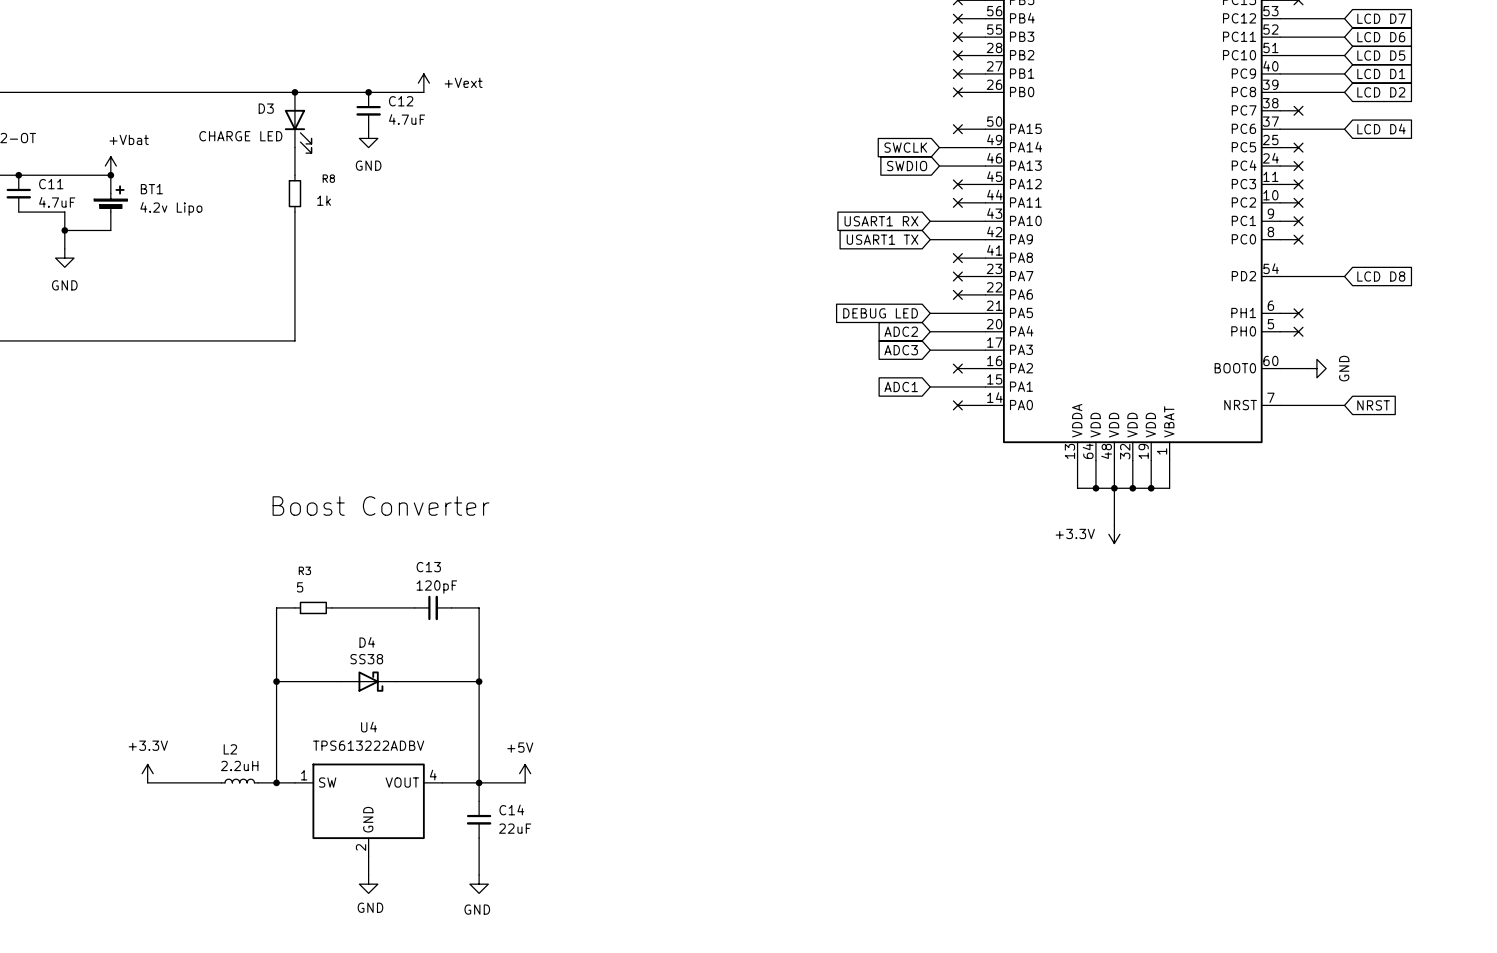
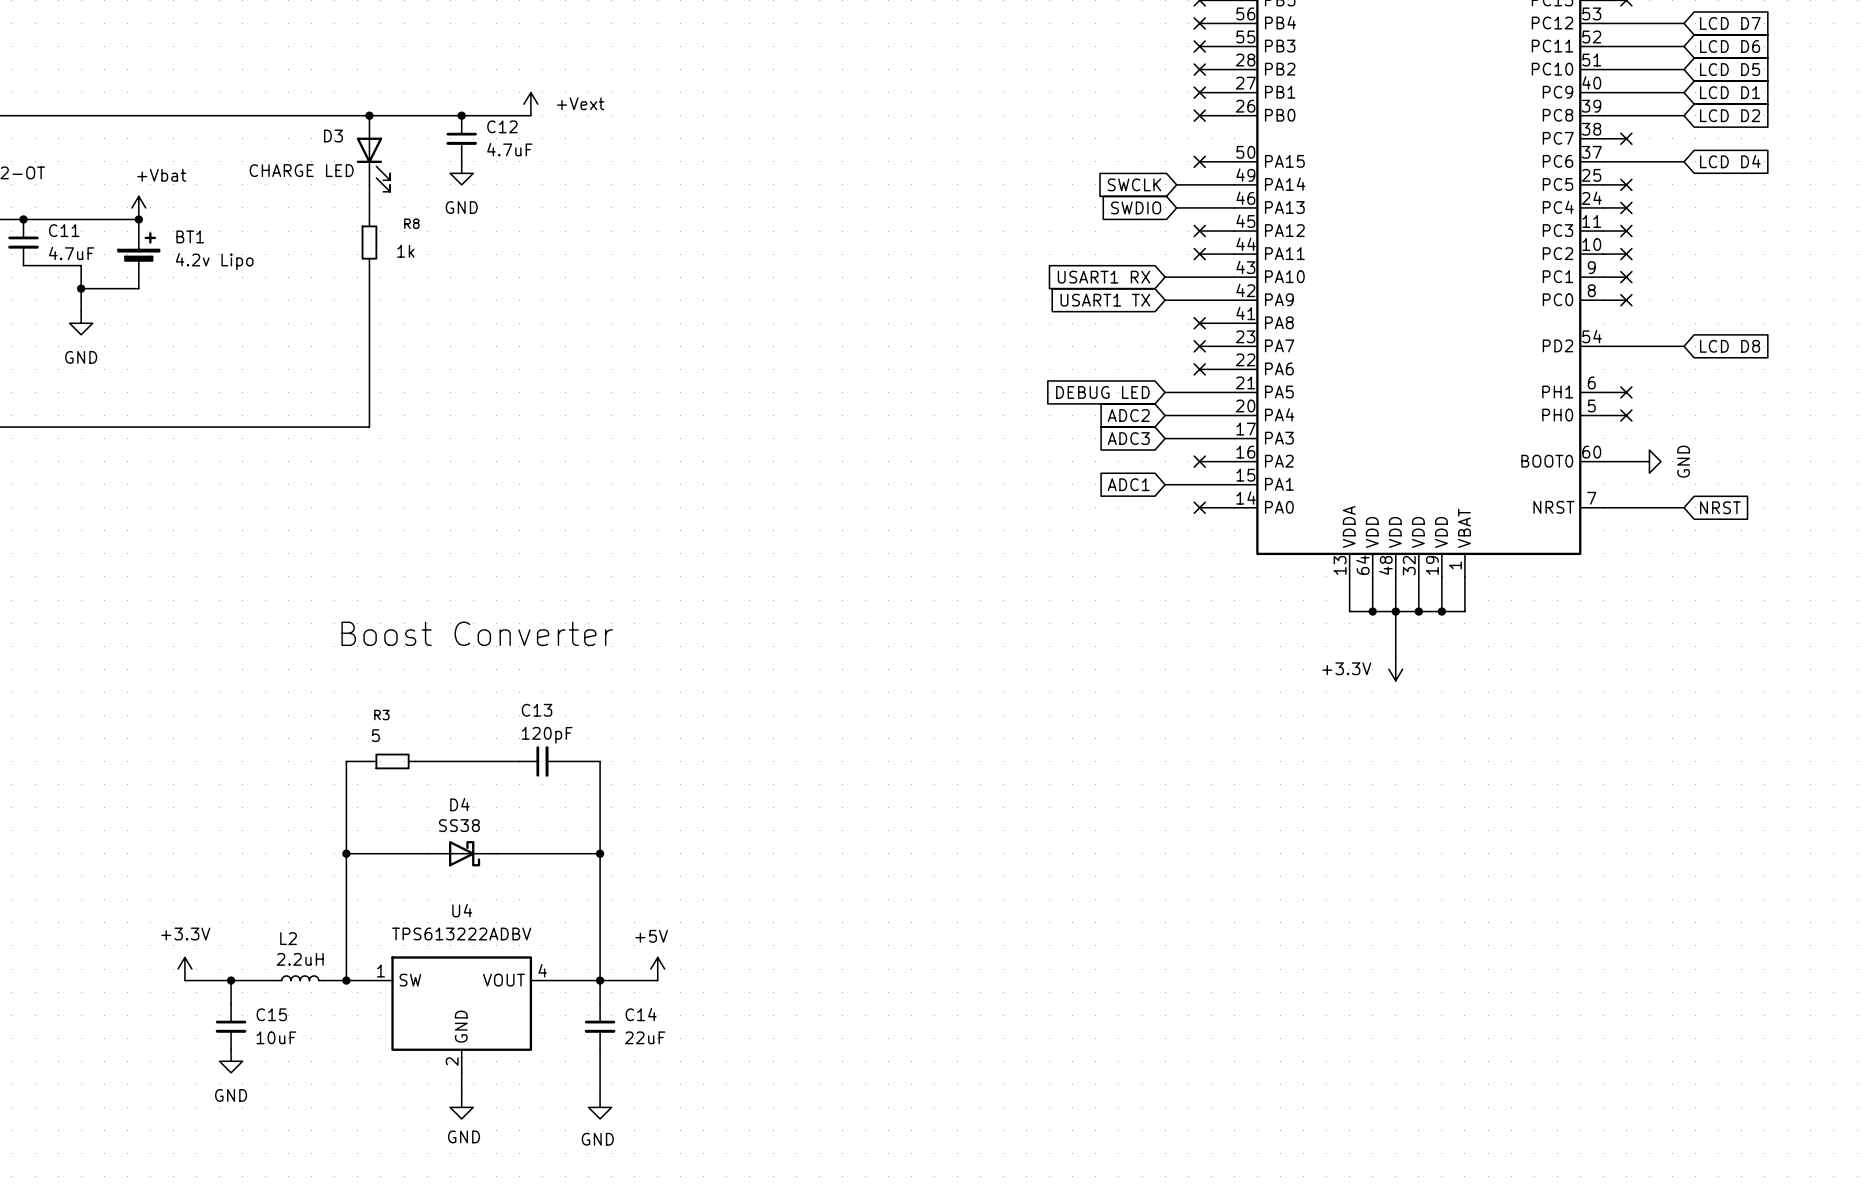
wire: none -> (231, 980) (231, 1003)
junction: none -> (231, 980)
C15: none -> 10uF (231, 1026)
power symbol: none -> GND (231, 1061)

